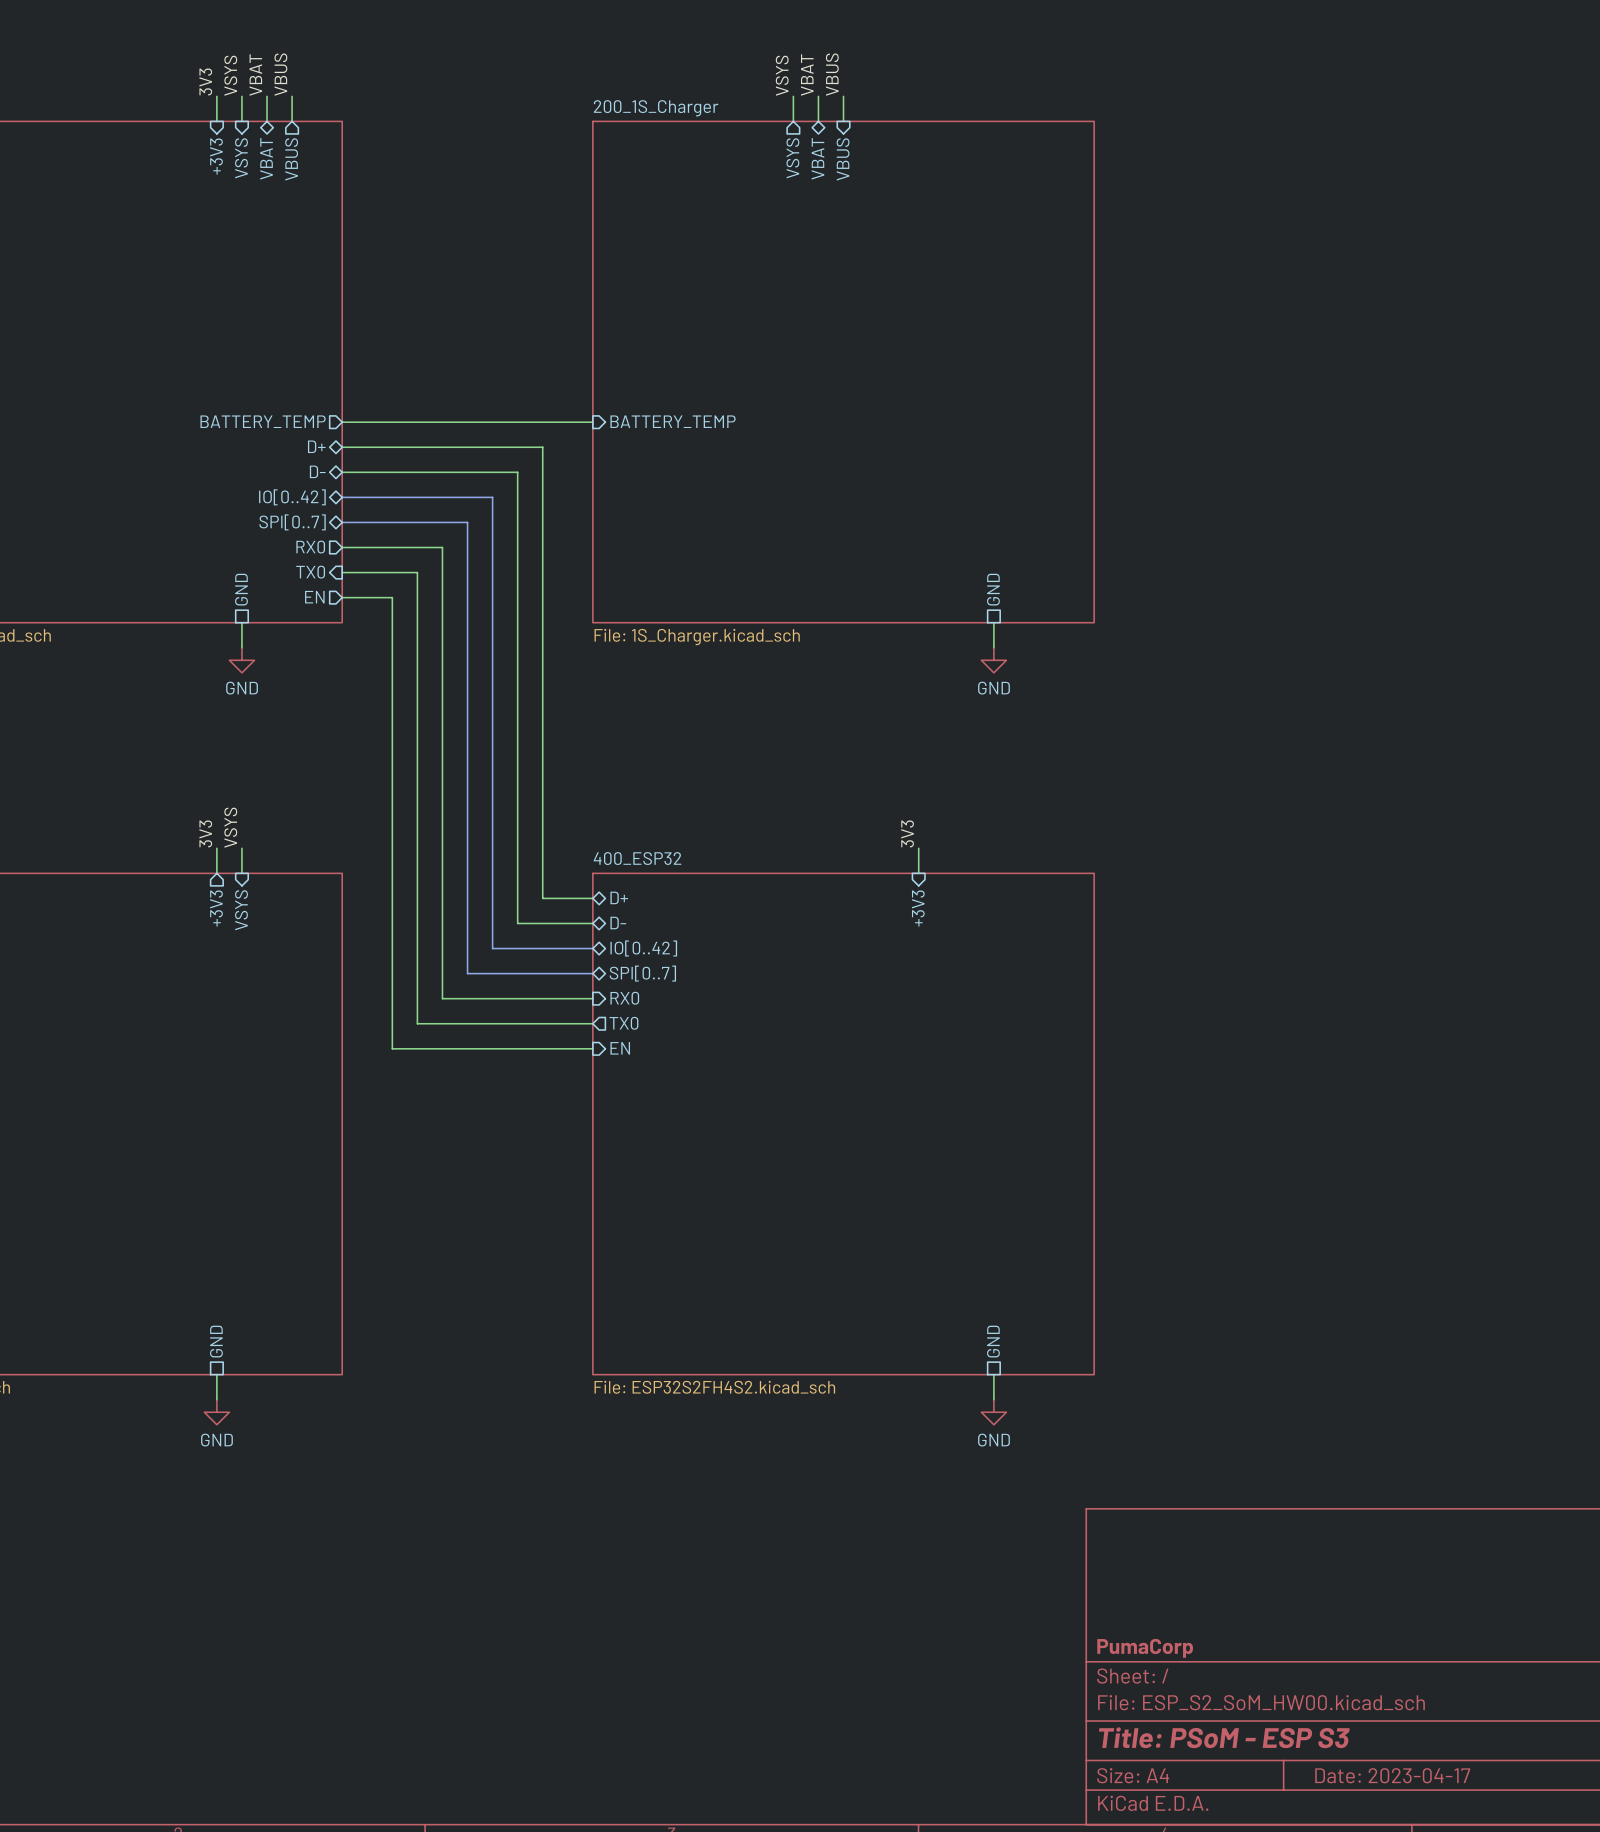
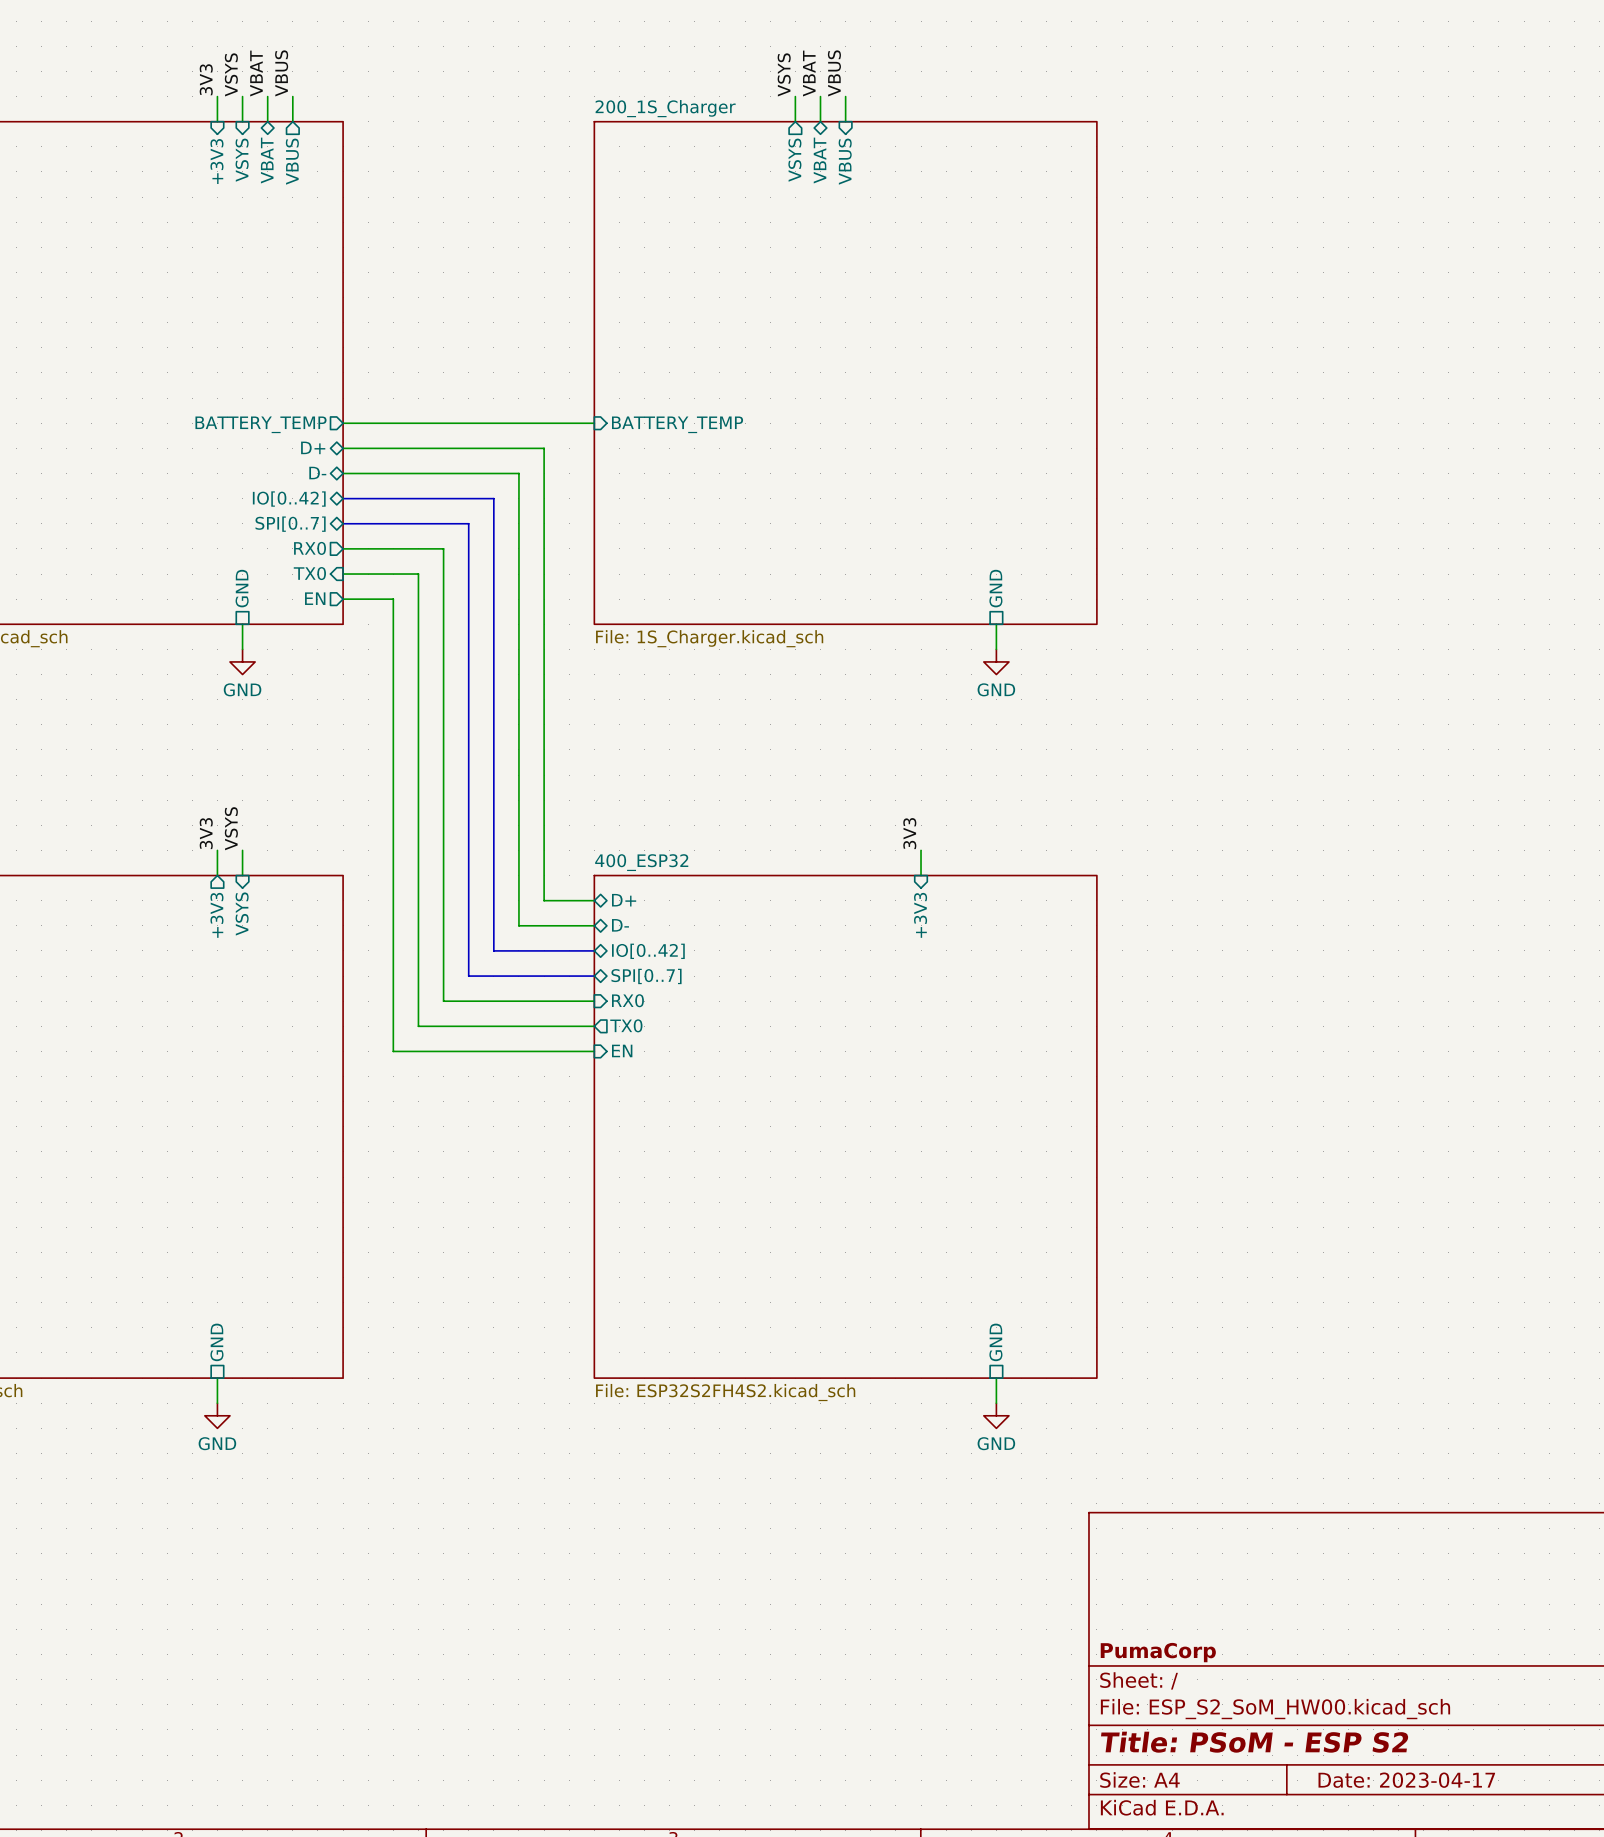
title block: Title: PSoM - ESP S3 (1224, 1737) -> Title: PSoM - ESP S2 (1254, 1742)

